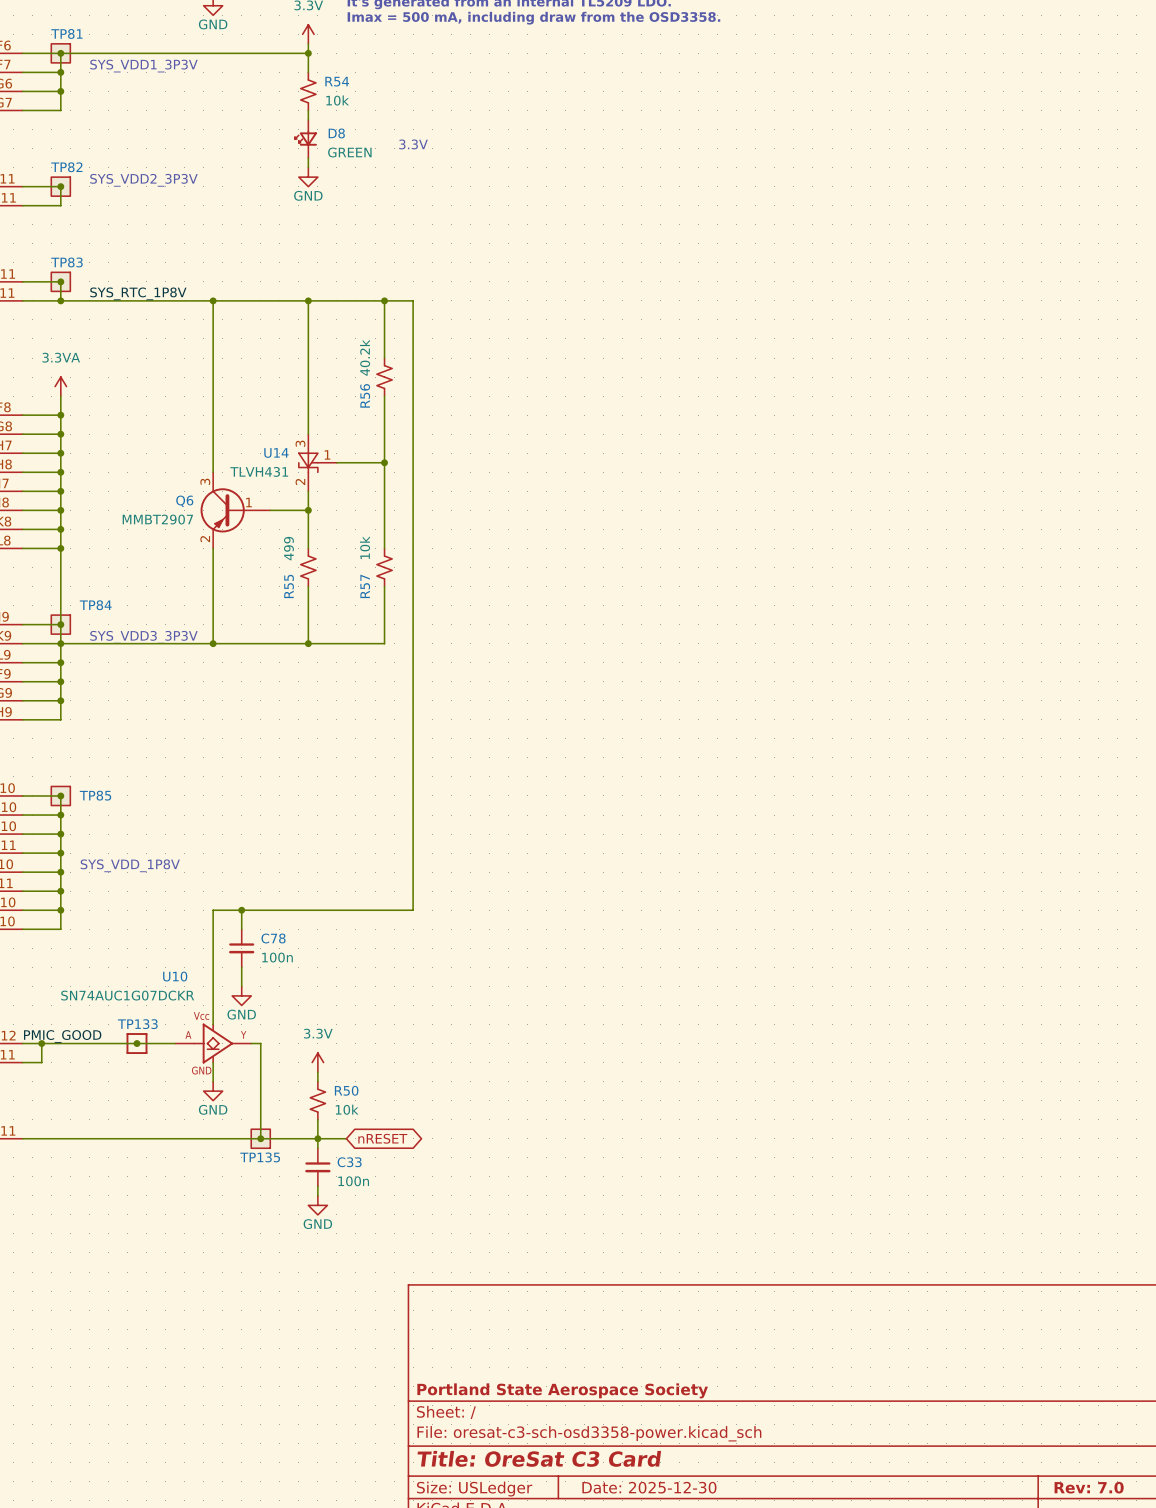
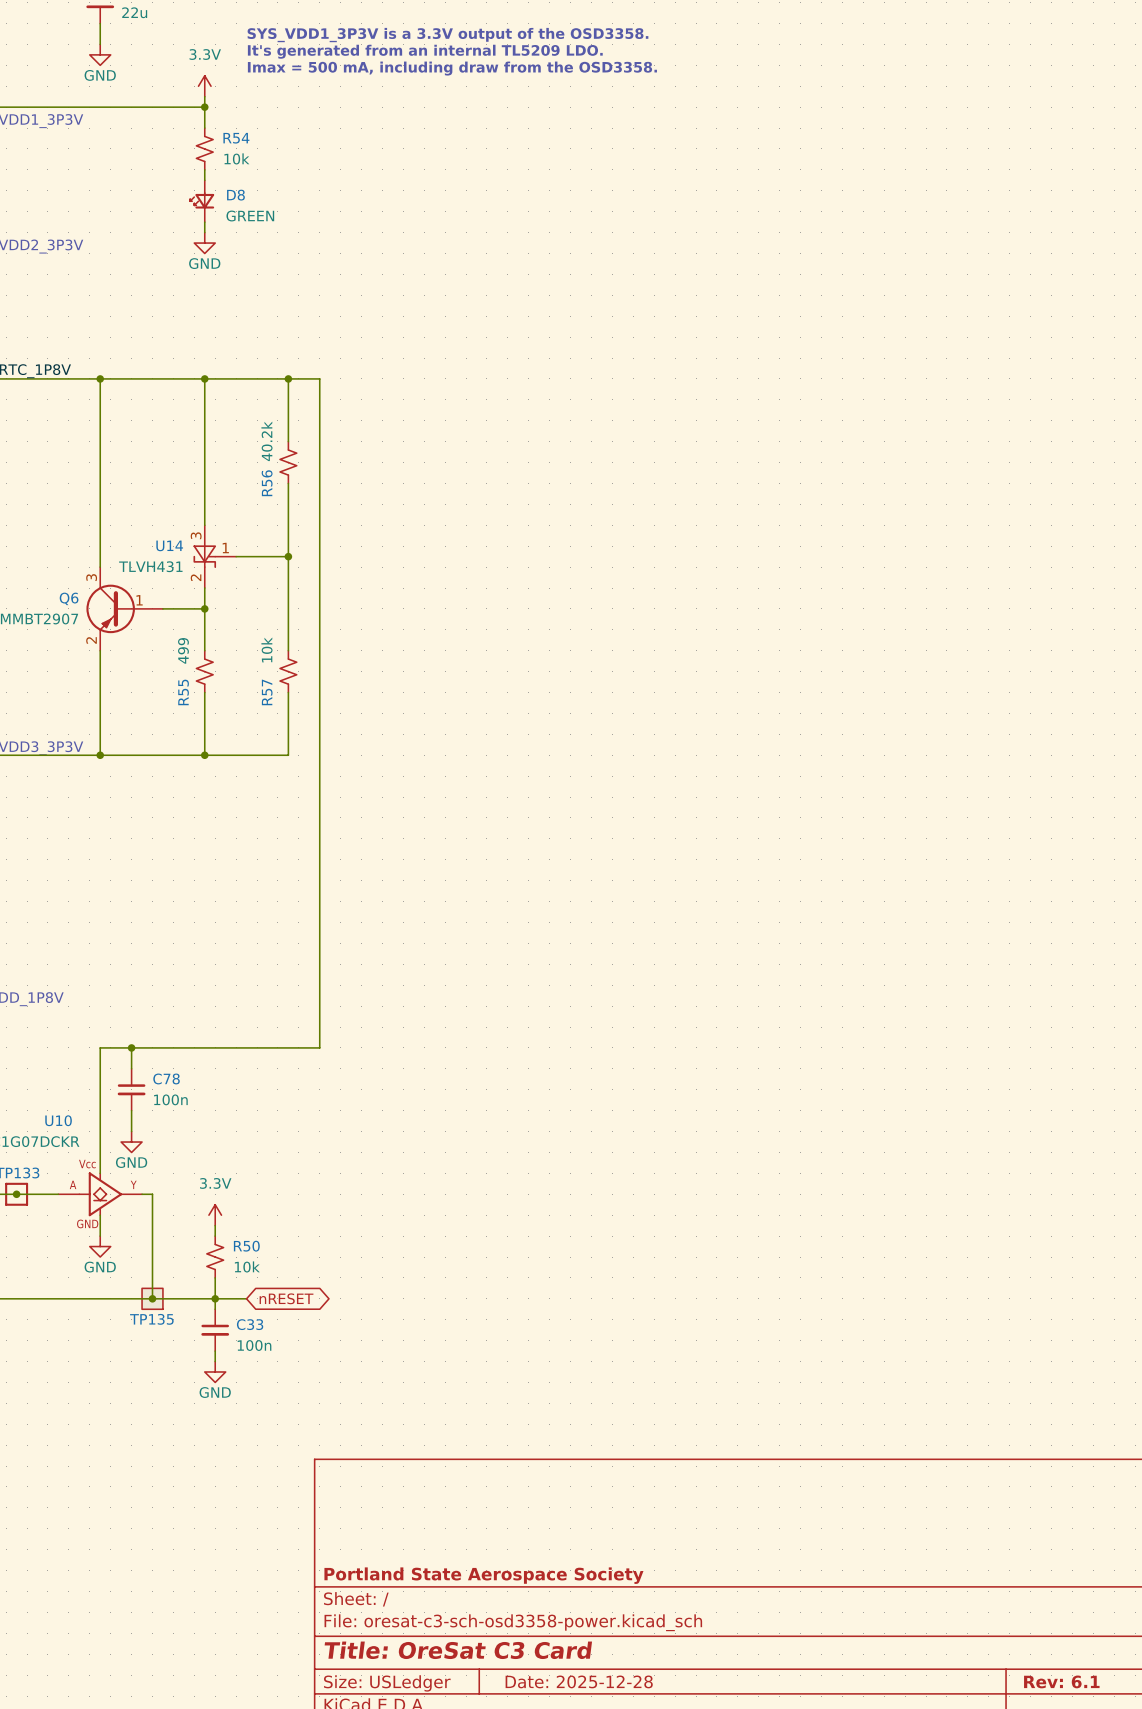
text: 3.3V (413, 144) -> none
title block: Date: 2025-12-30 (649, 1487) -> Date: 2025-12-28 (579, 1681)
title block: Rev: 7.0 (1089, 1487) -> Rev: 6.1 (1061, 1681)

